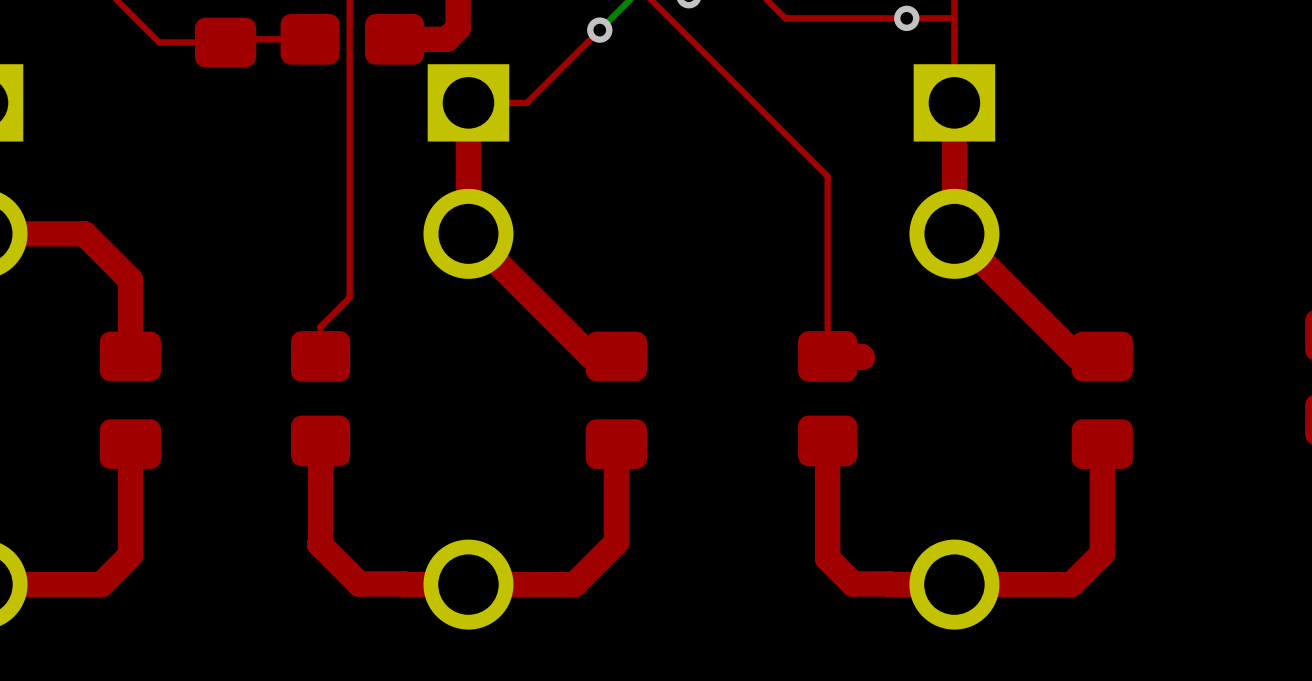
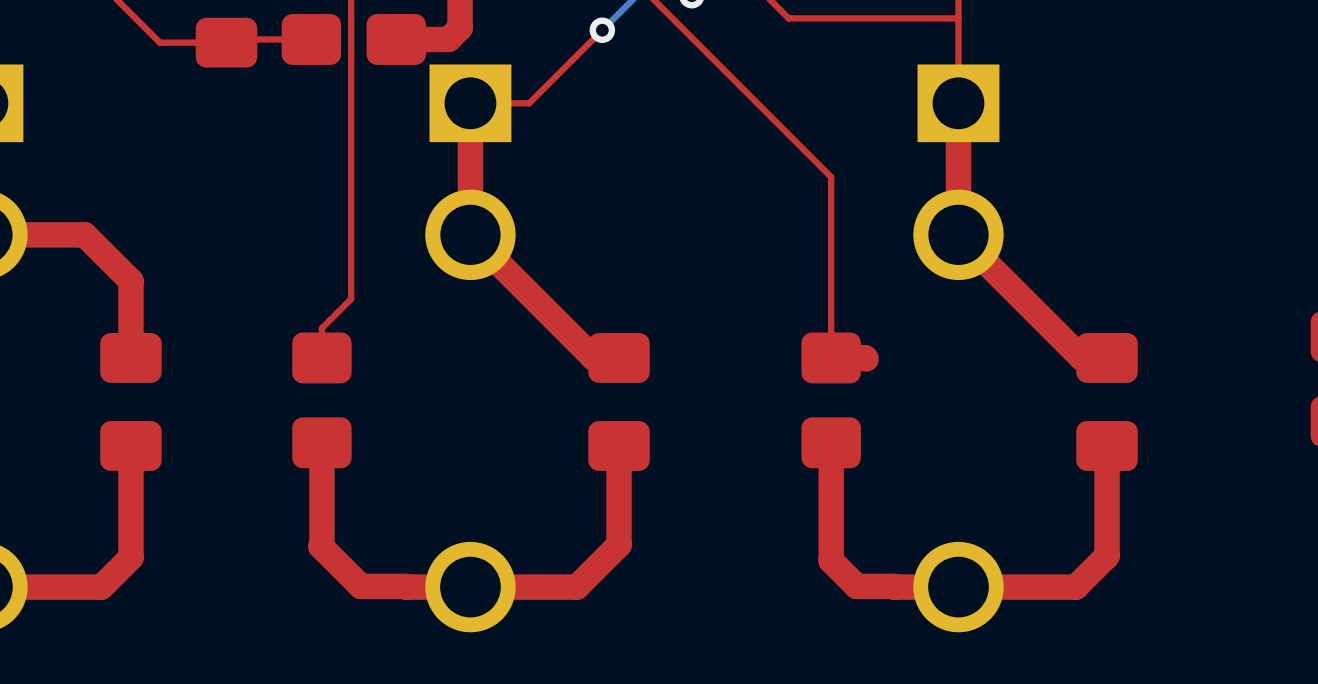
via: (906, 18) -> none

